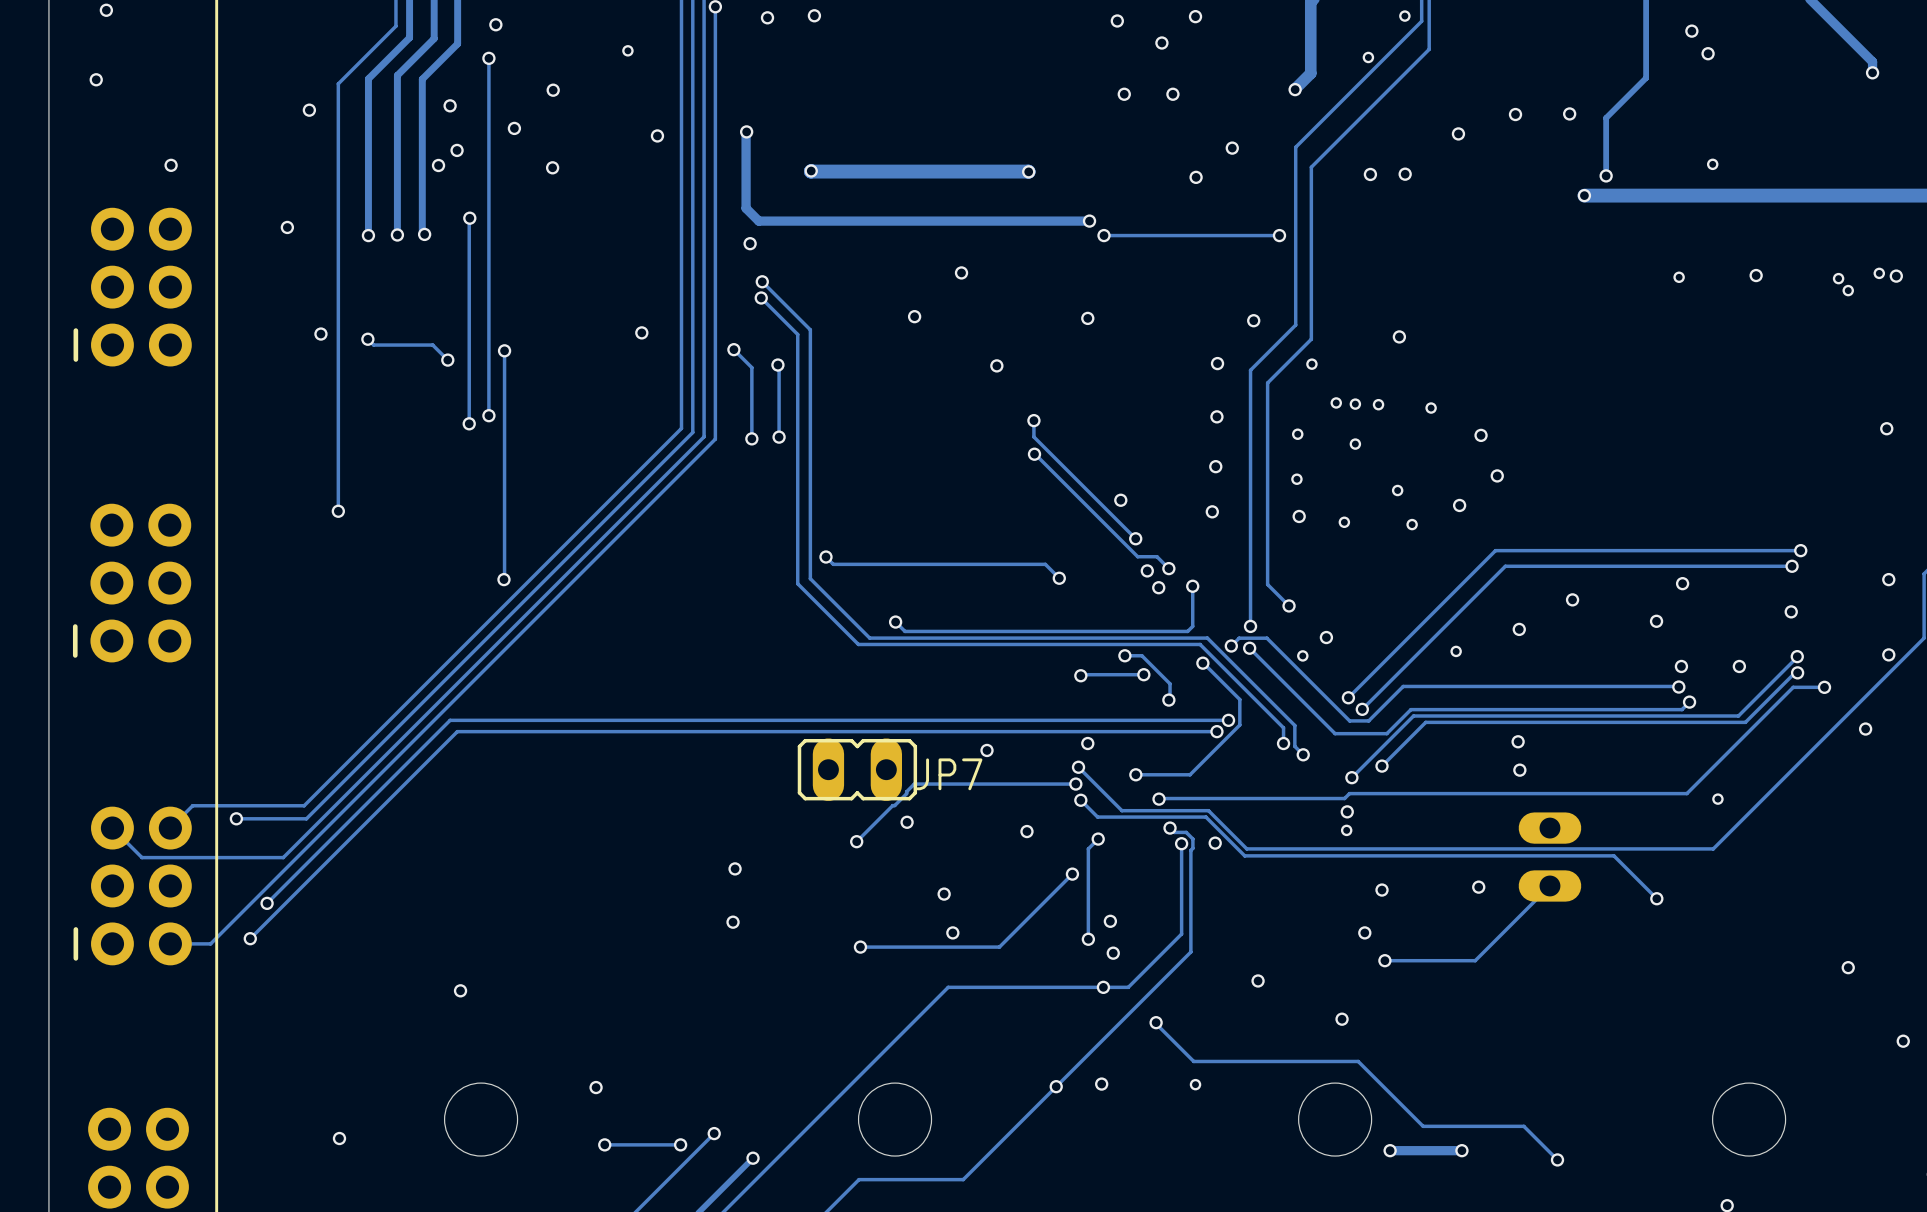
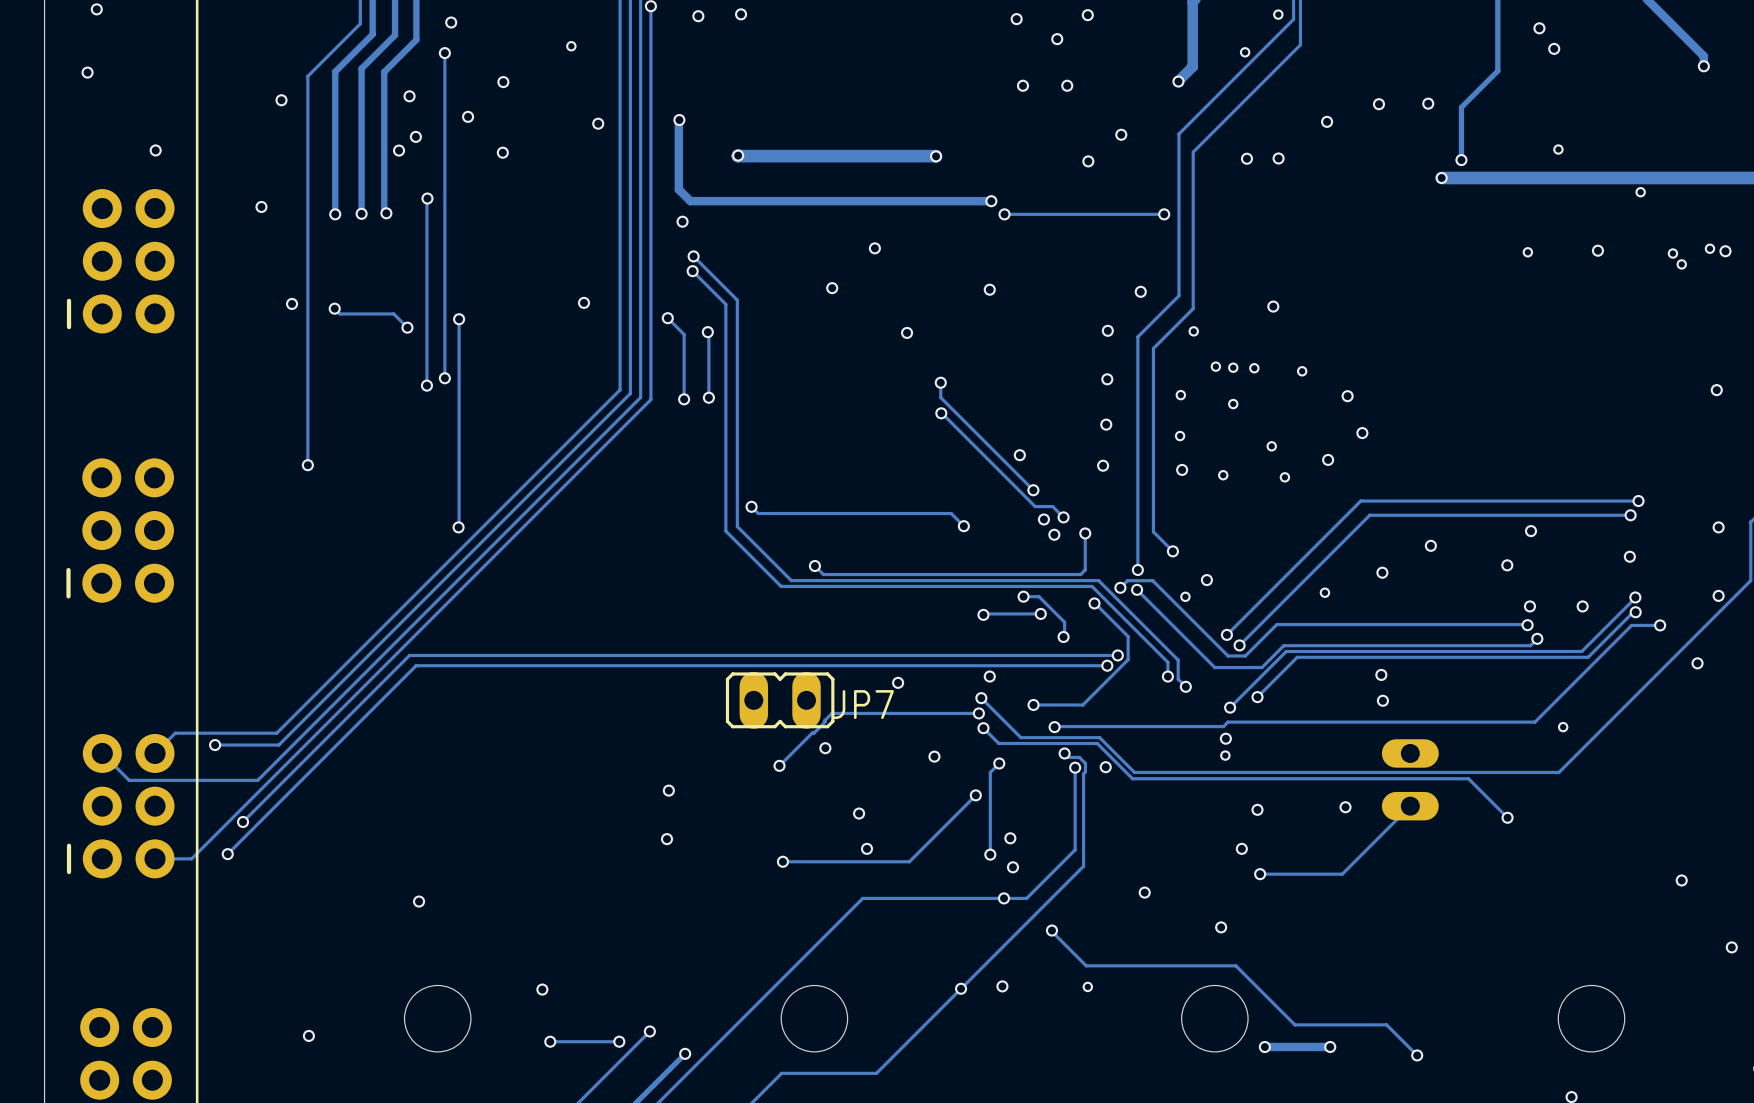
via: none -> (1640, 192)

